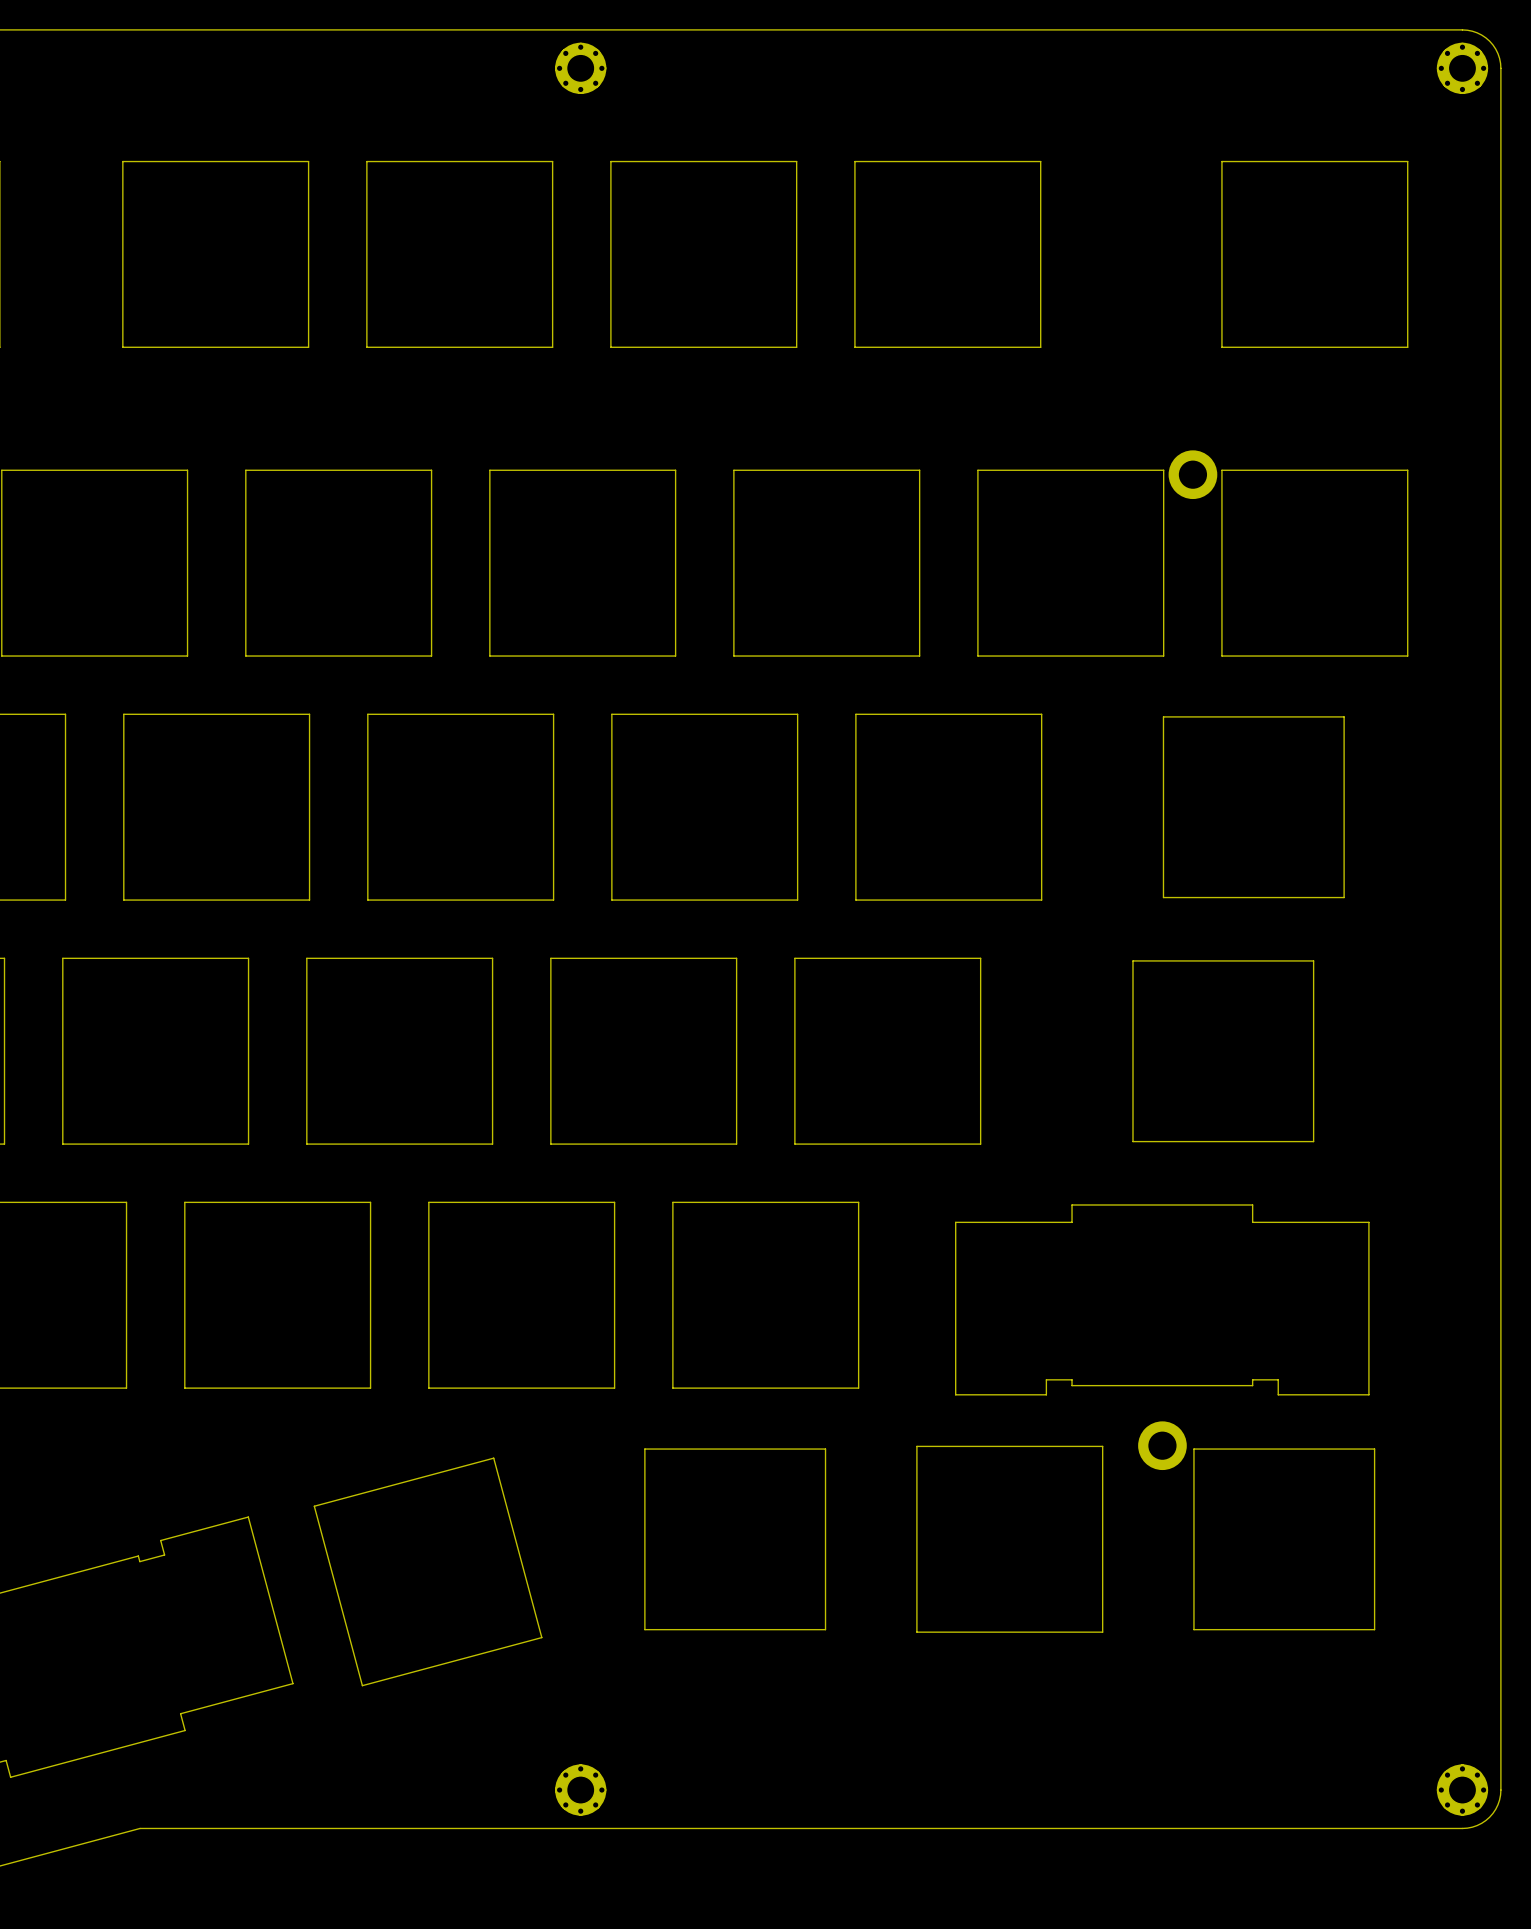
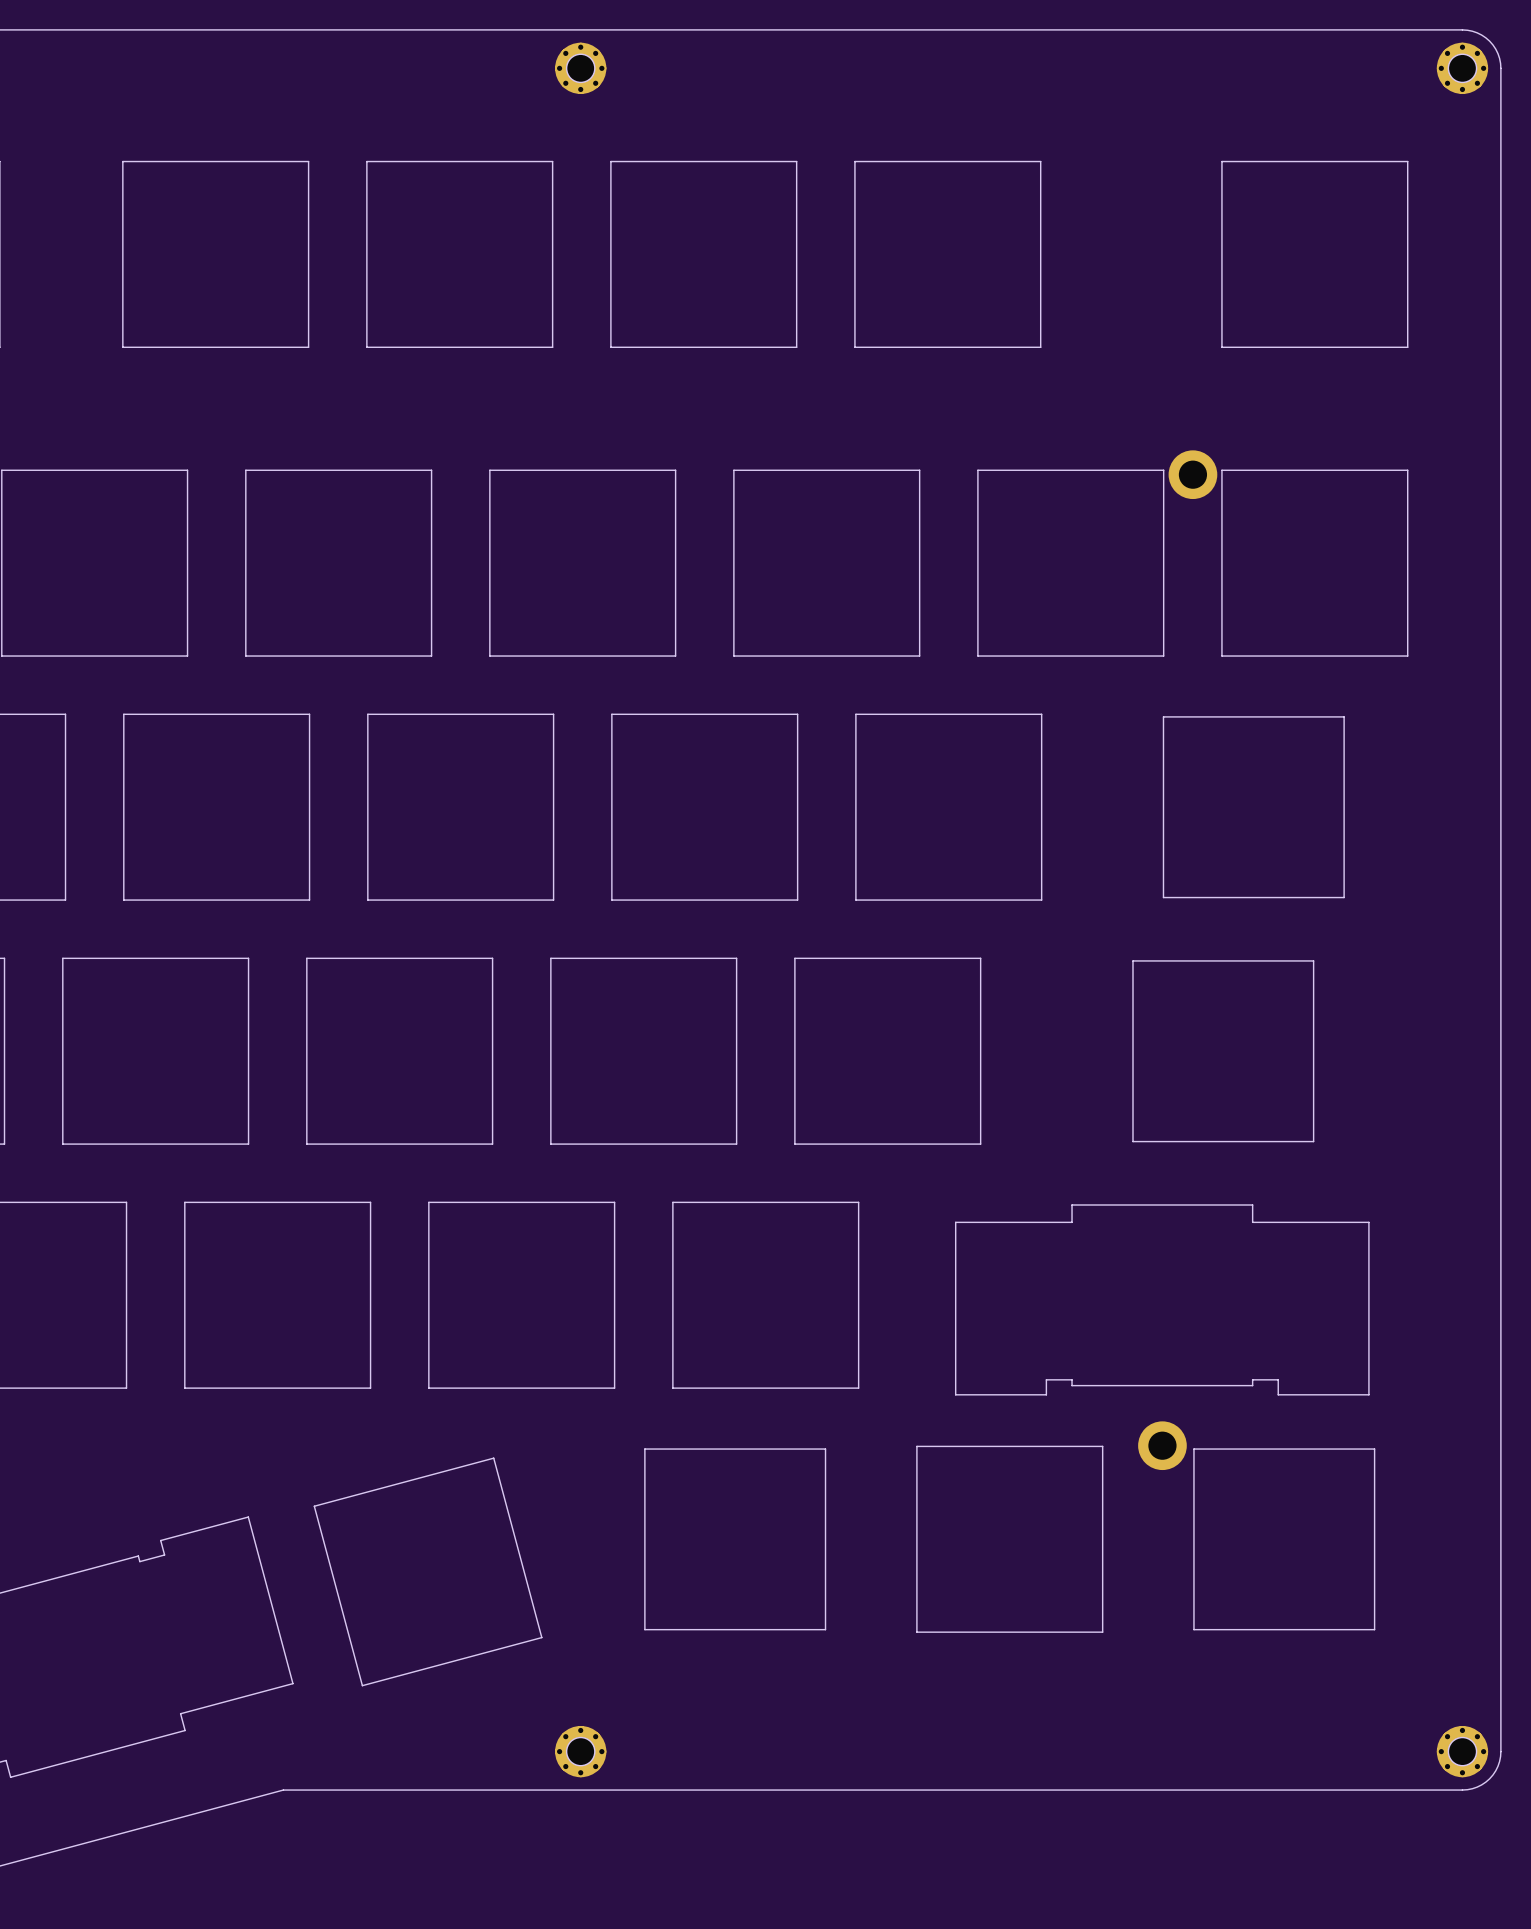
board edge: (1500, 1751) (1500, 1795) (1495, 1809) (1481, 1823) (1462, 1828) (140, 1828) -> (1500, 1751) (1497, 1766) (1489, 1778) (1477, 1787) (1462, 1790) (283, 1790) (140, 1828)
part position: (580, 1790) -> (580, 1751)
round board edge position: (580, 1790) -> (580, 1751)
part position: (1462, 1790) -> (1462, 1751)
round board edge position: (1462, 1790) -> (1462, 1751)

